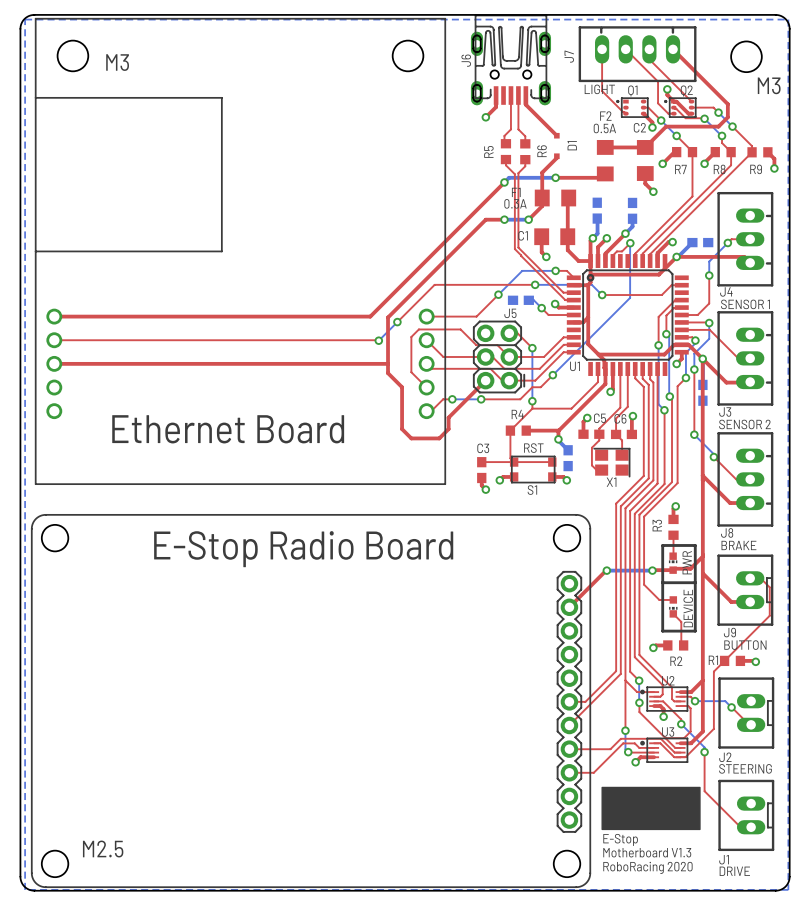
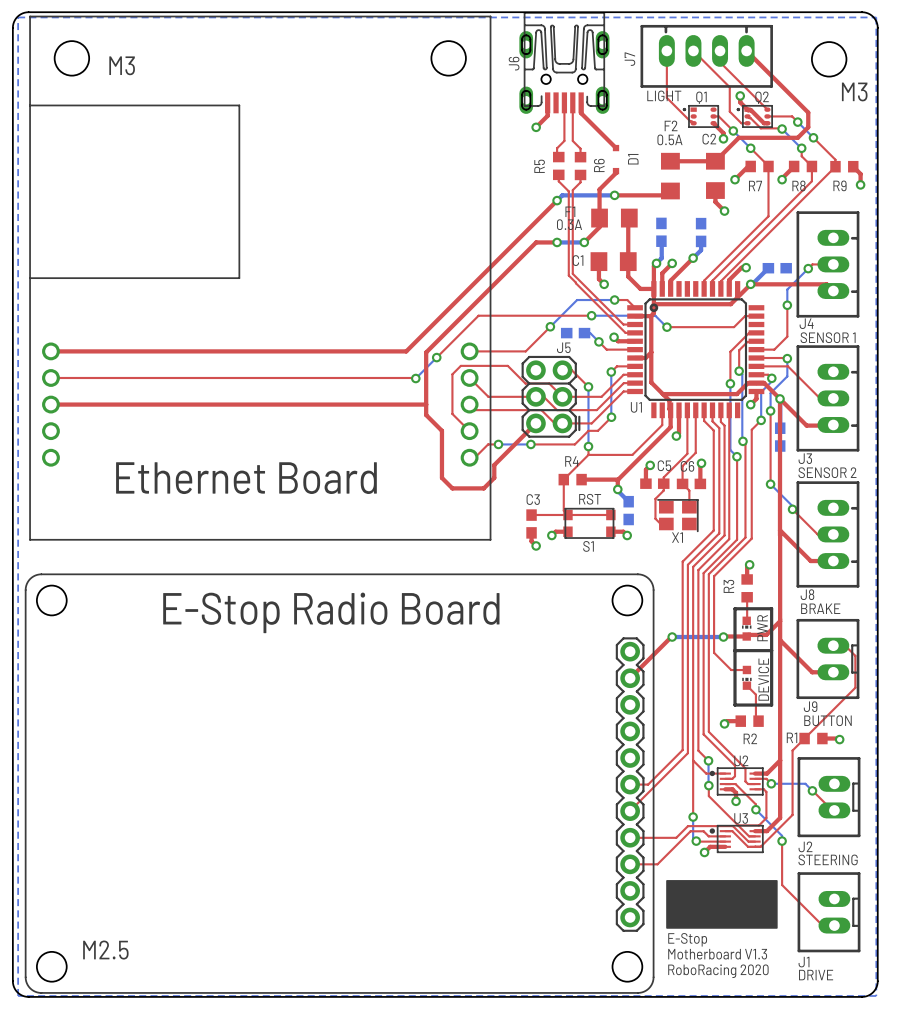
top track: (630, 243) (622, 251) (616, 251) (612, 255) (612, 261) -> none
bottom track: (630, 243) (630, 297) (552, 375) -> (611, 372) (611, 417)
via: (630, 243) -> none
top track: none -> (635, 366) (616, 366) (611, 372)
via: none -> (611, 372)

